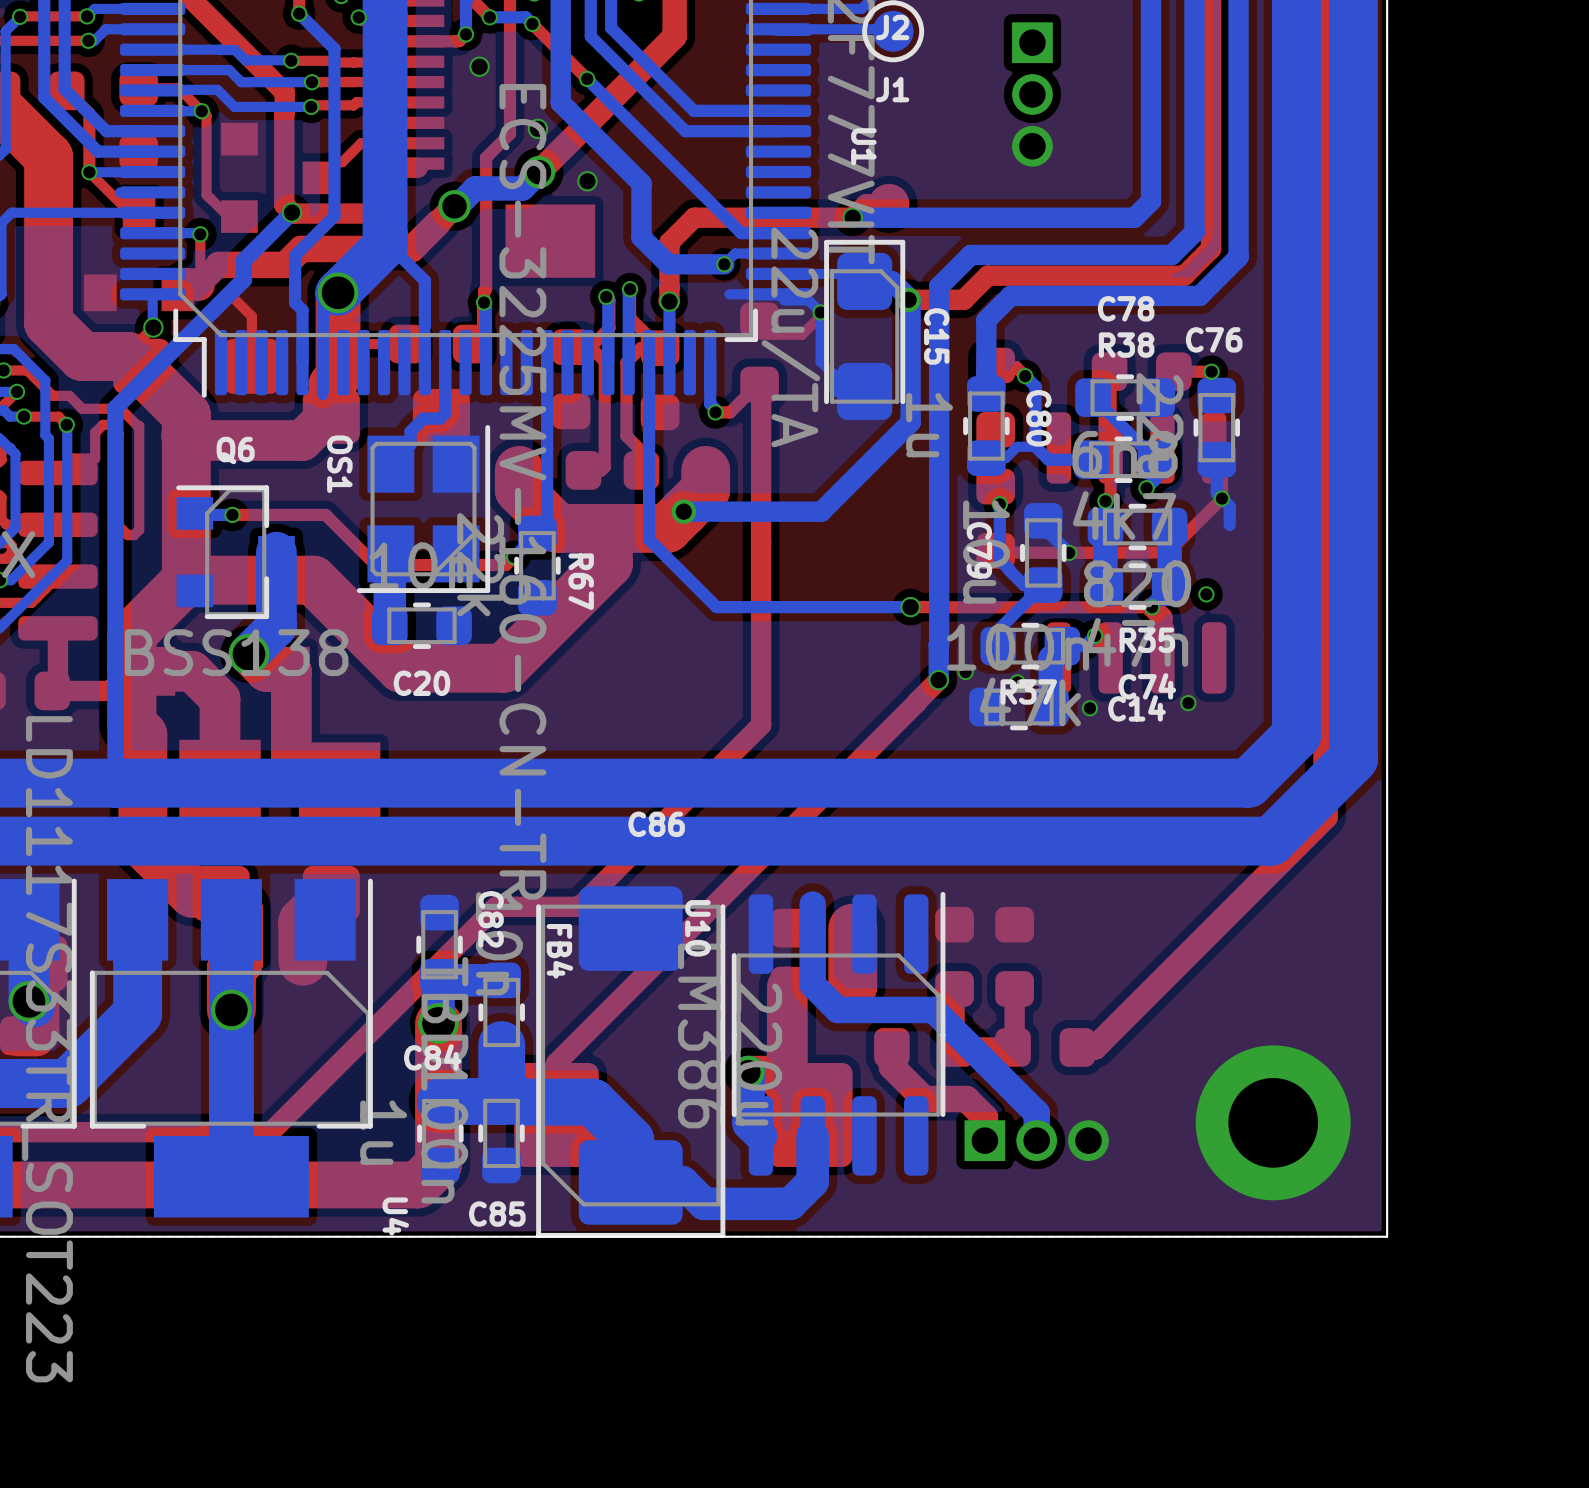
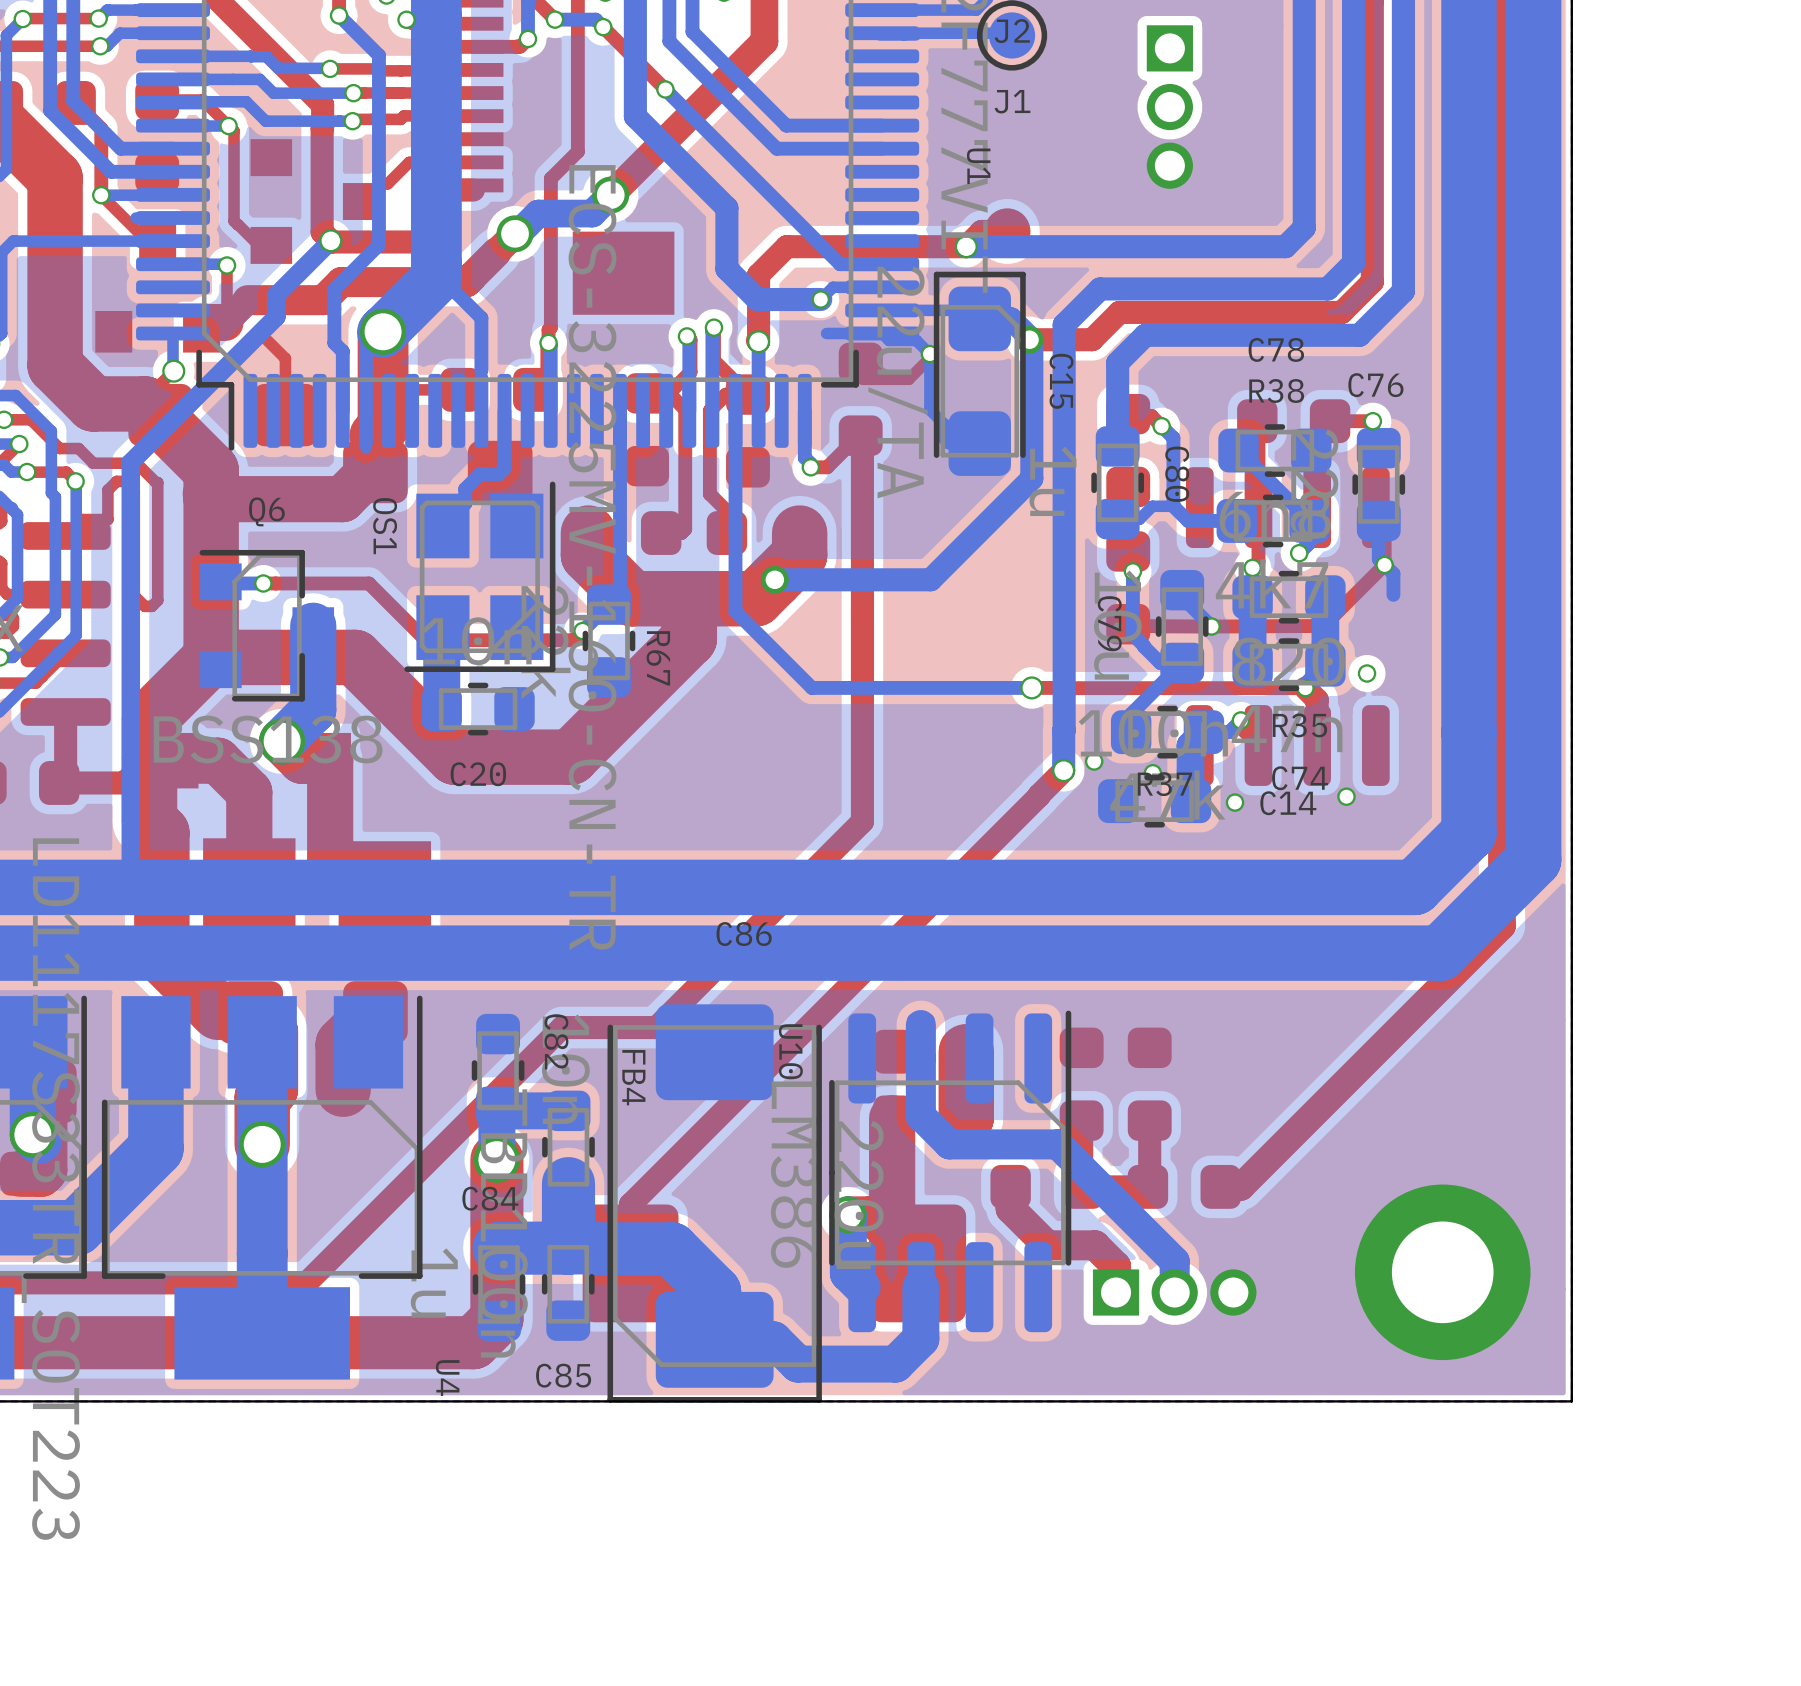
via: (479, 66) -> none
via: (537, 128) -> none
via: (587, 181) -> none

